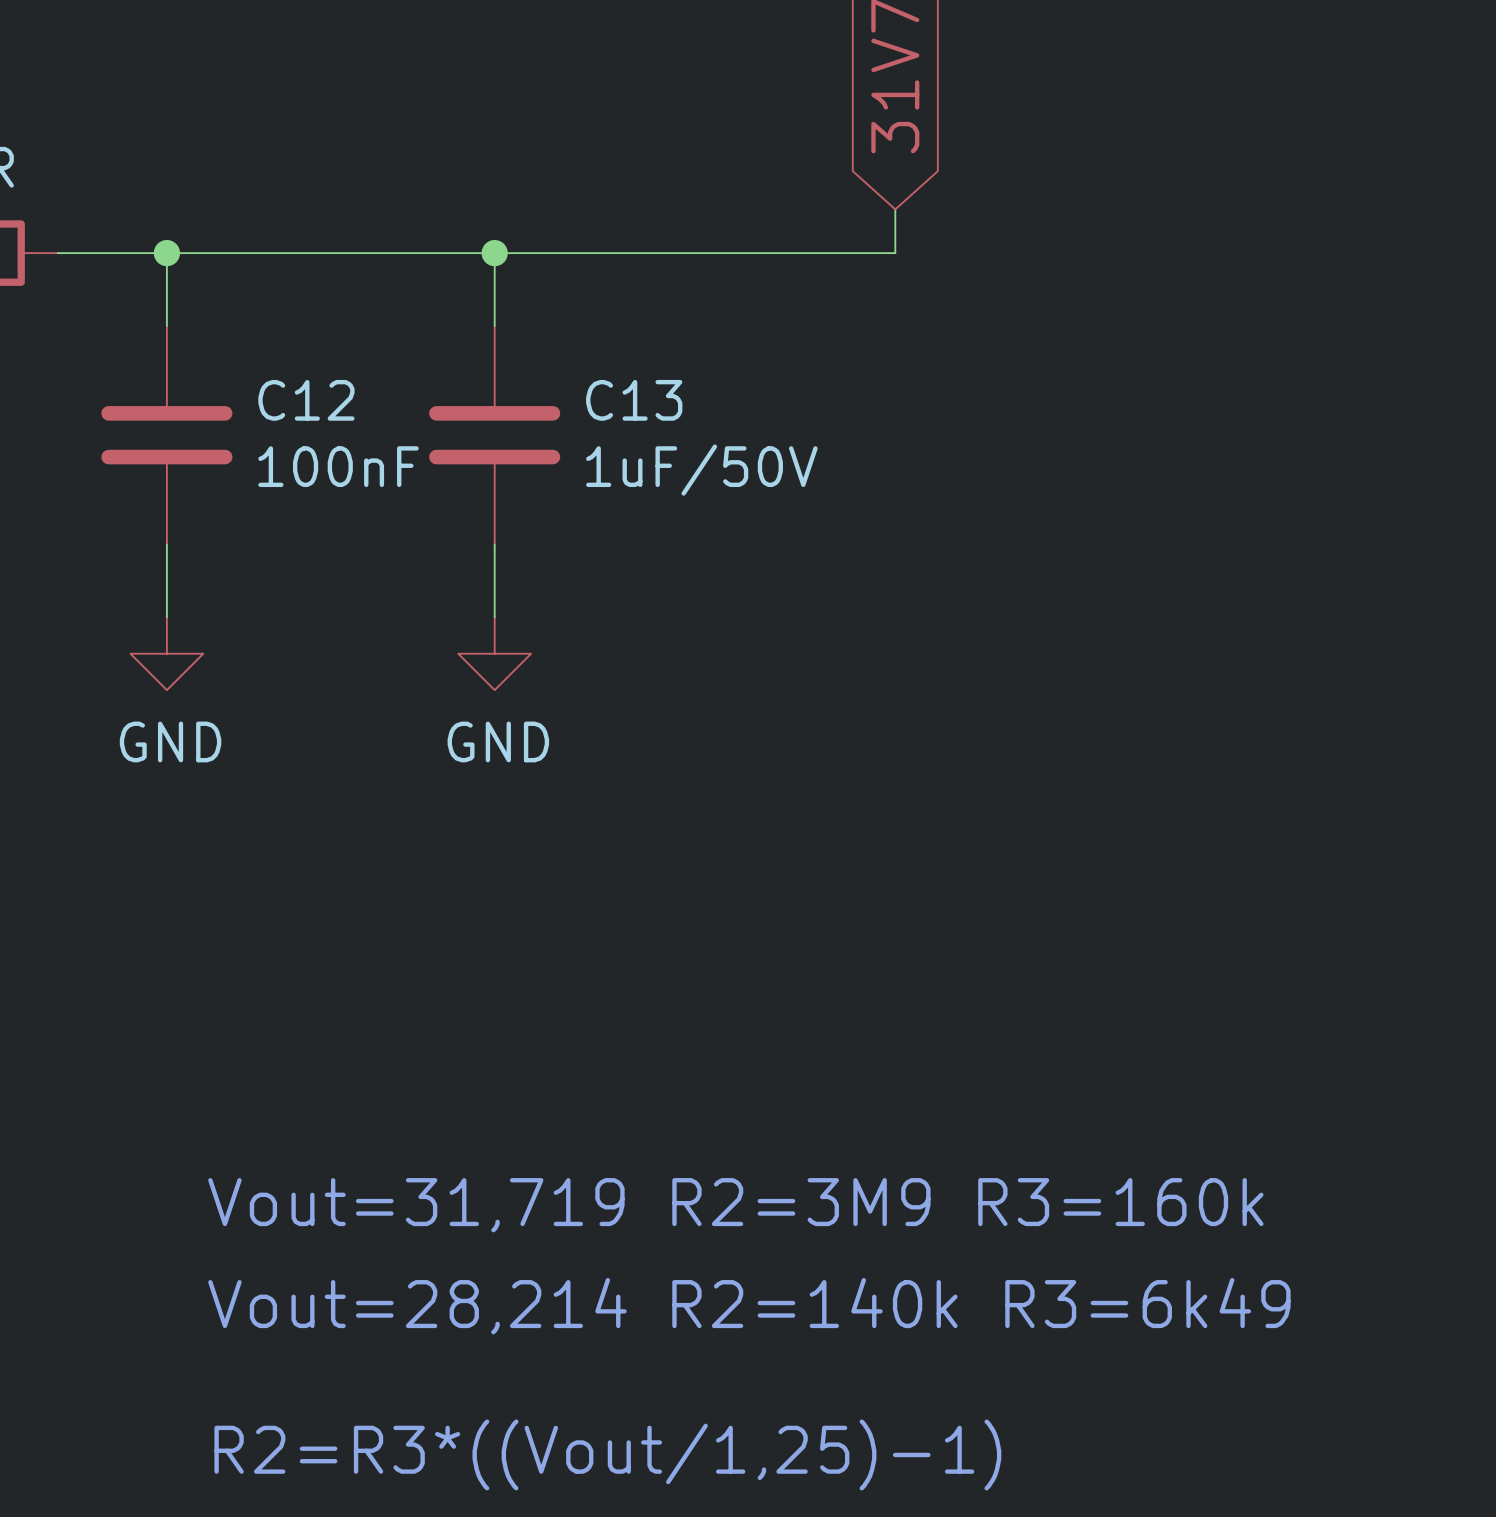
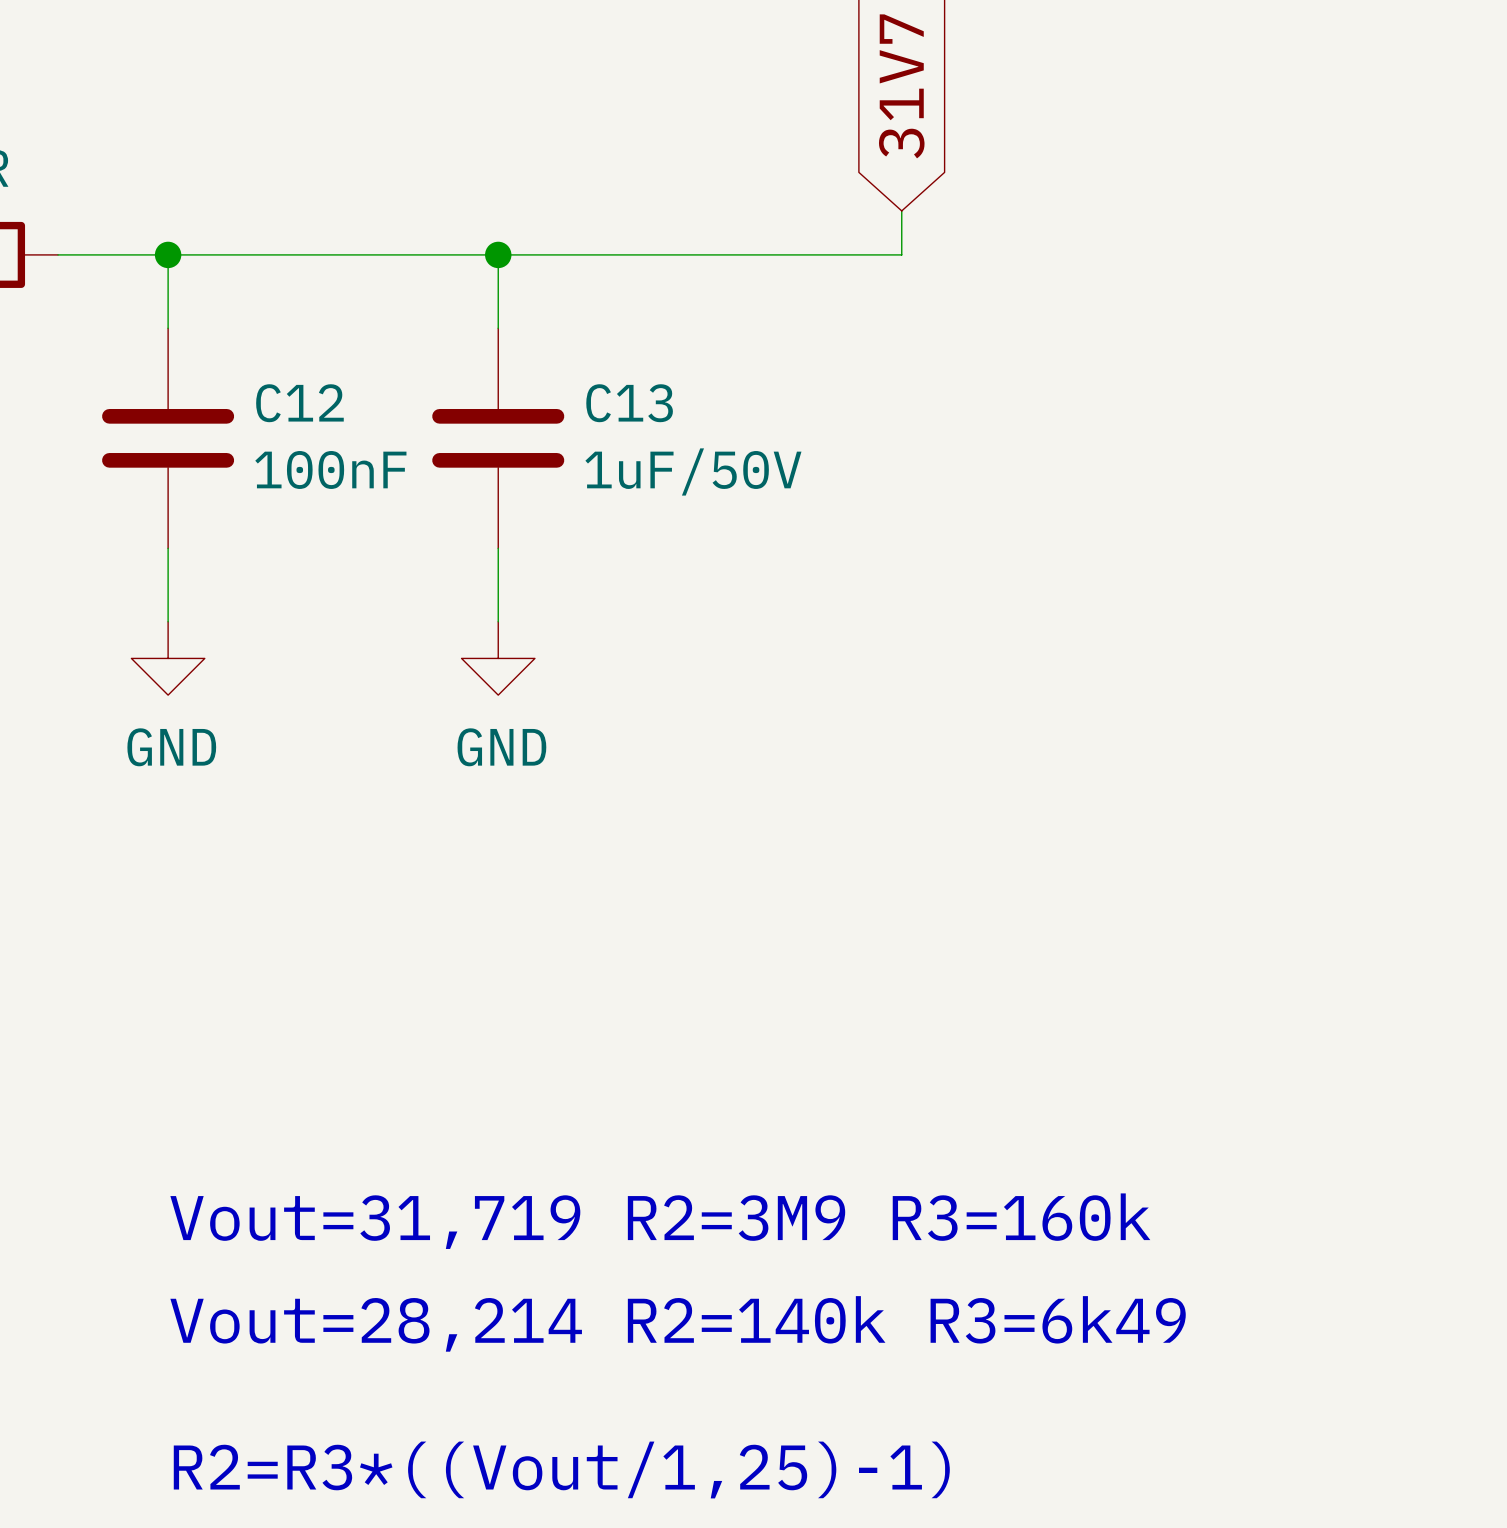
text position: Vout=31,719 R2=3M9 R3=160k (735, 1205) -> Vout=31,719 R2=3M9 R3=160k (660, 1221)
text position: Vout=28,214 R2=140k R3=6k49 (749, 1306) -> Vout=28,214 R2=140k R3=6k49 (678, 1323)
text position: R2=R3*((Vout/1,25)-1) (607, 1454) -> R2=R3*((Vout/1,25)-1) (561, 1469)

